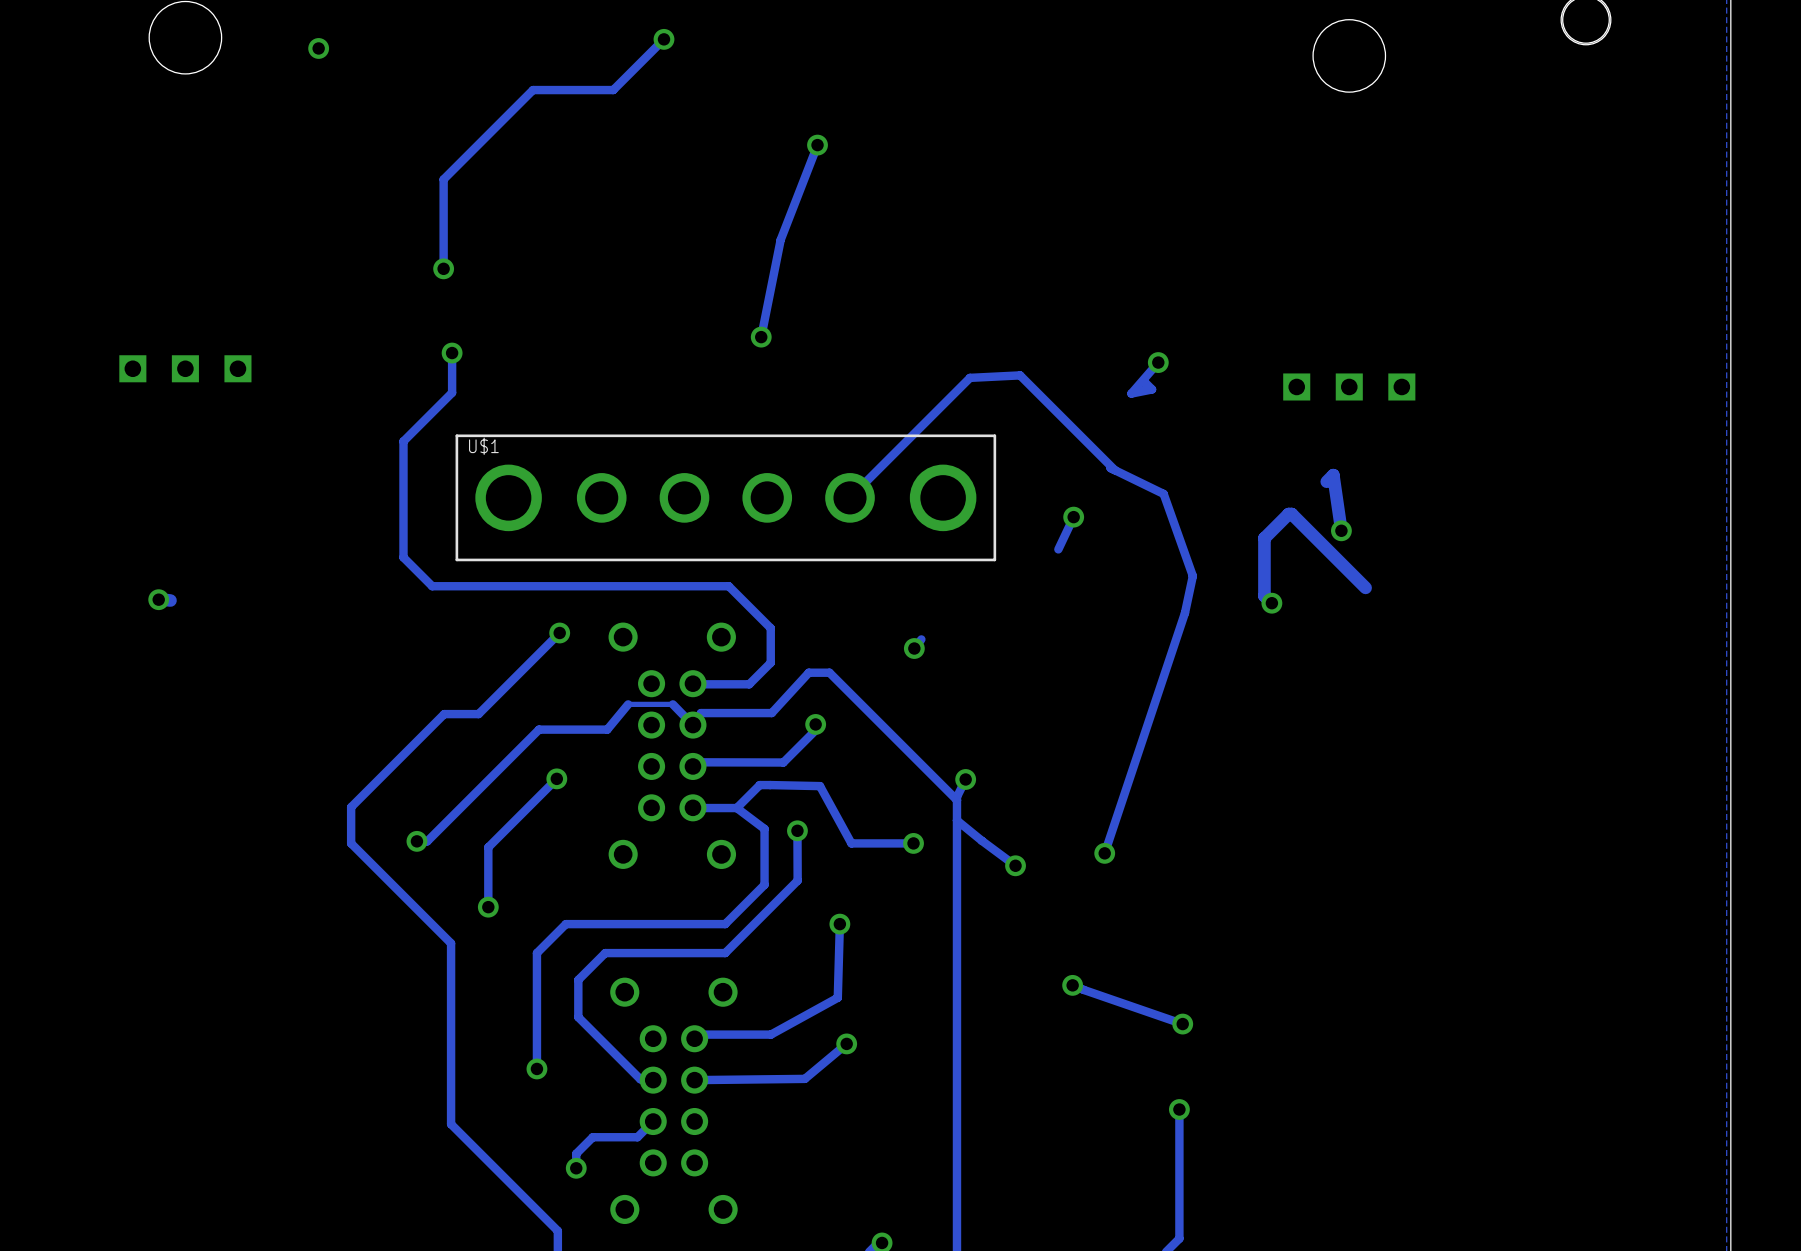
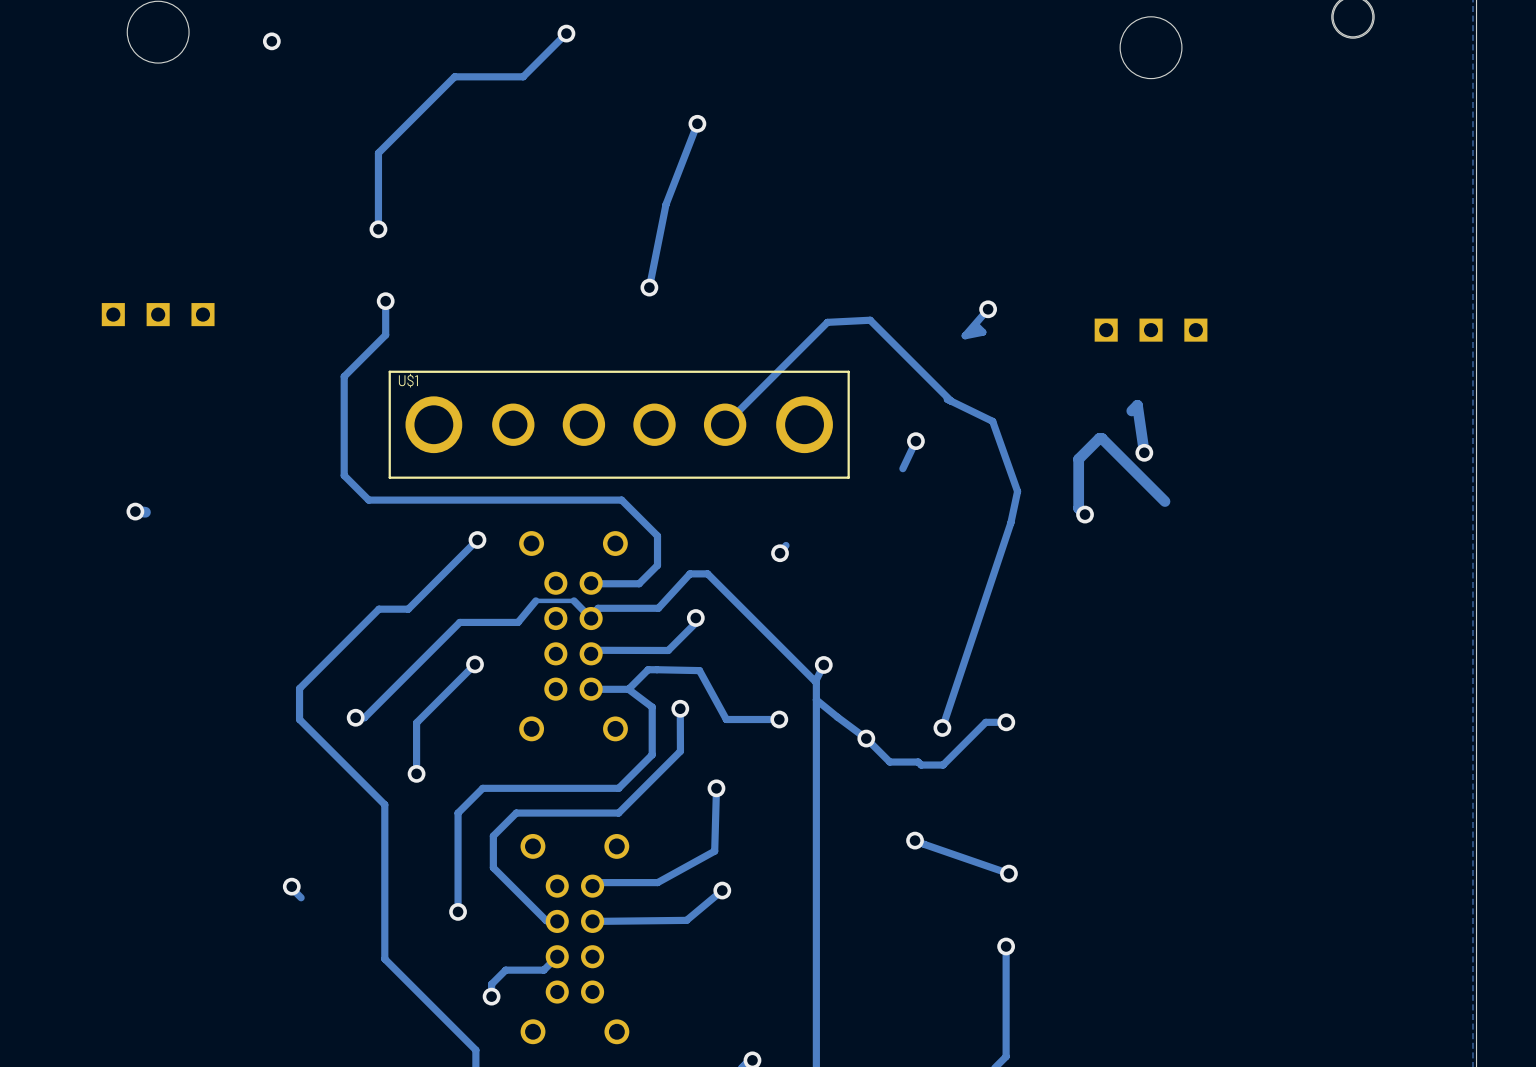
track: none -> (1006, 722) (985, 722) (943, 765) (921, 765) (918, 762) (889, 762) (866, 738)
via: none -> (1006, 722)
track: none -> (291, 886) (301, 897)
via: none -> (291, 886)

